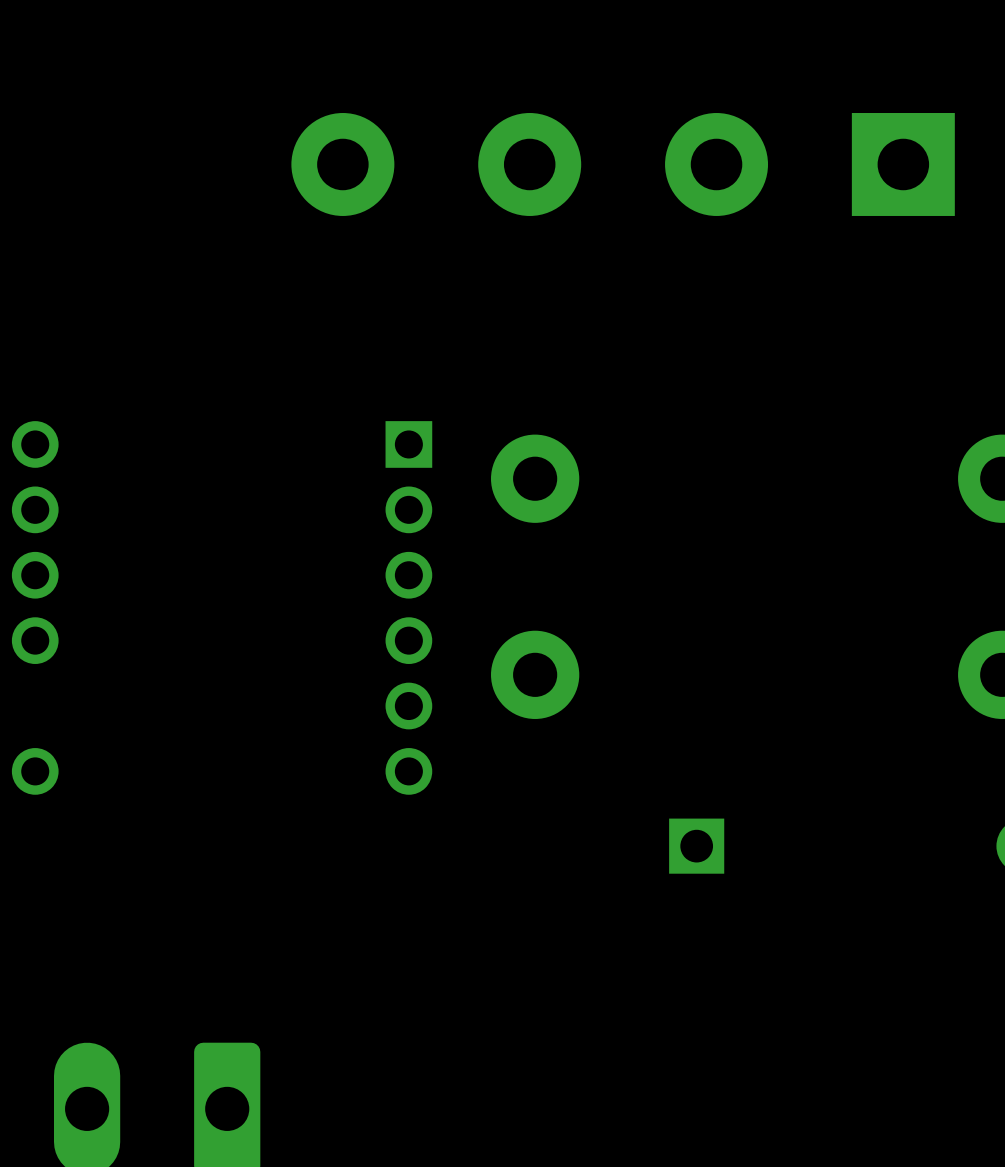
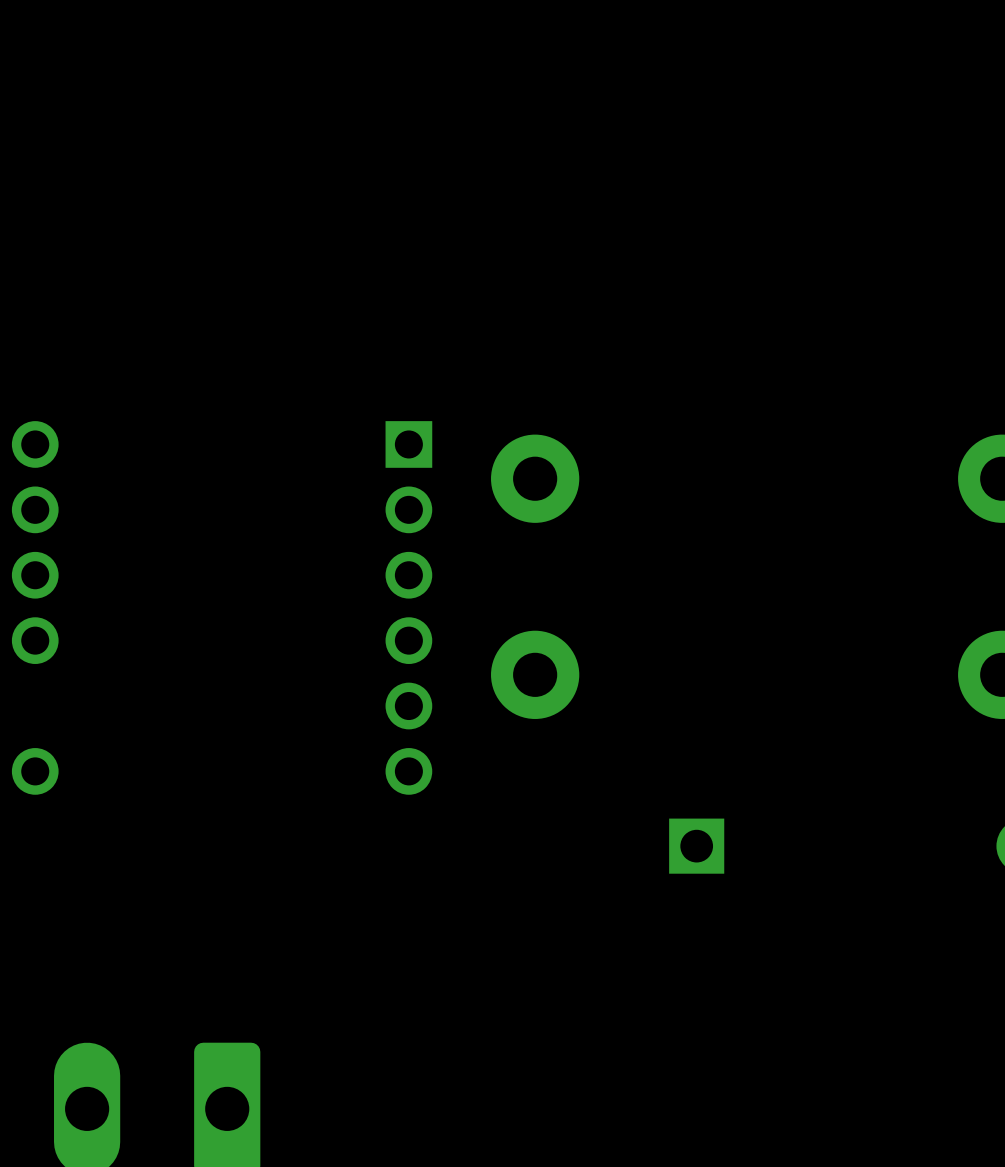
part: (623, 164) -> none

